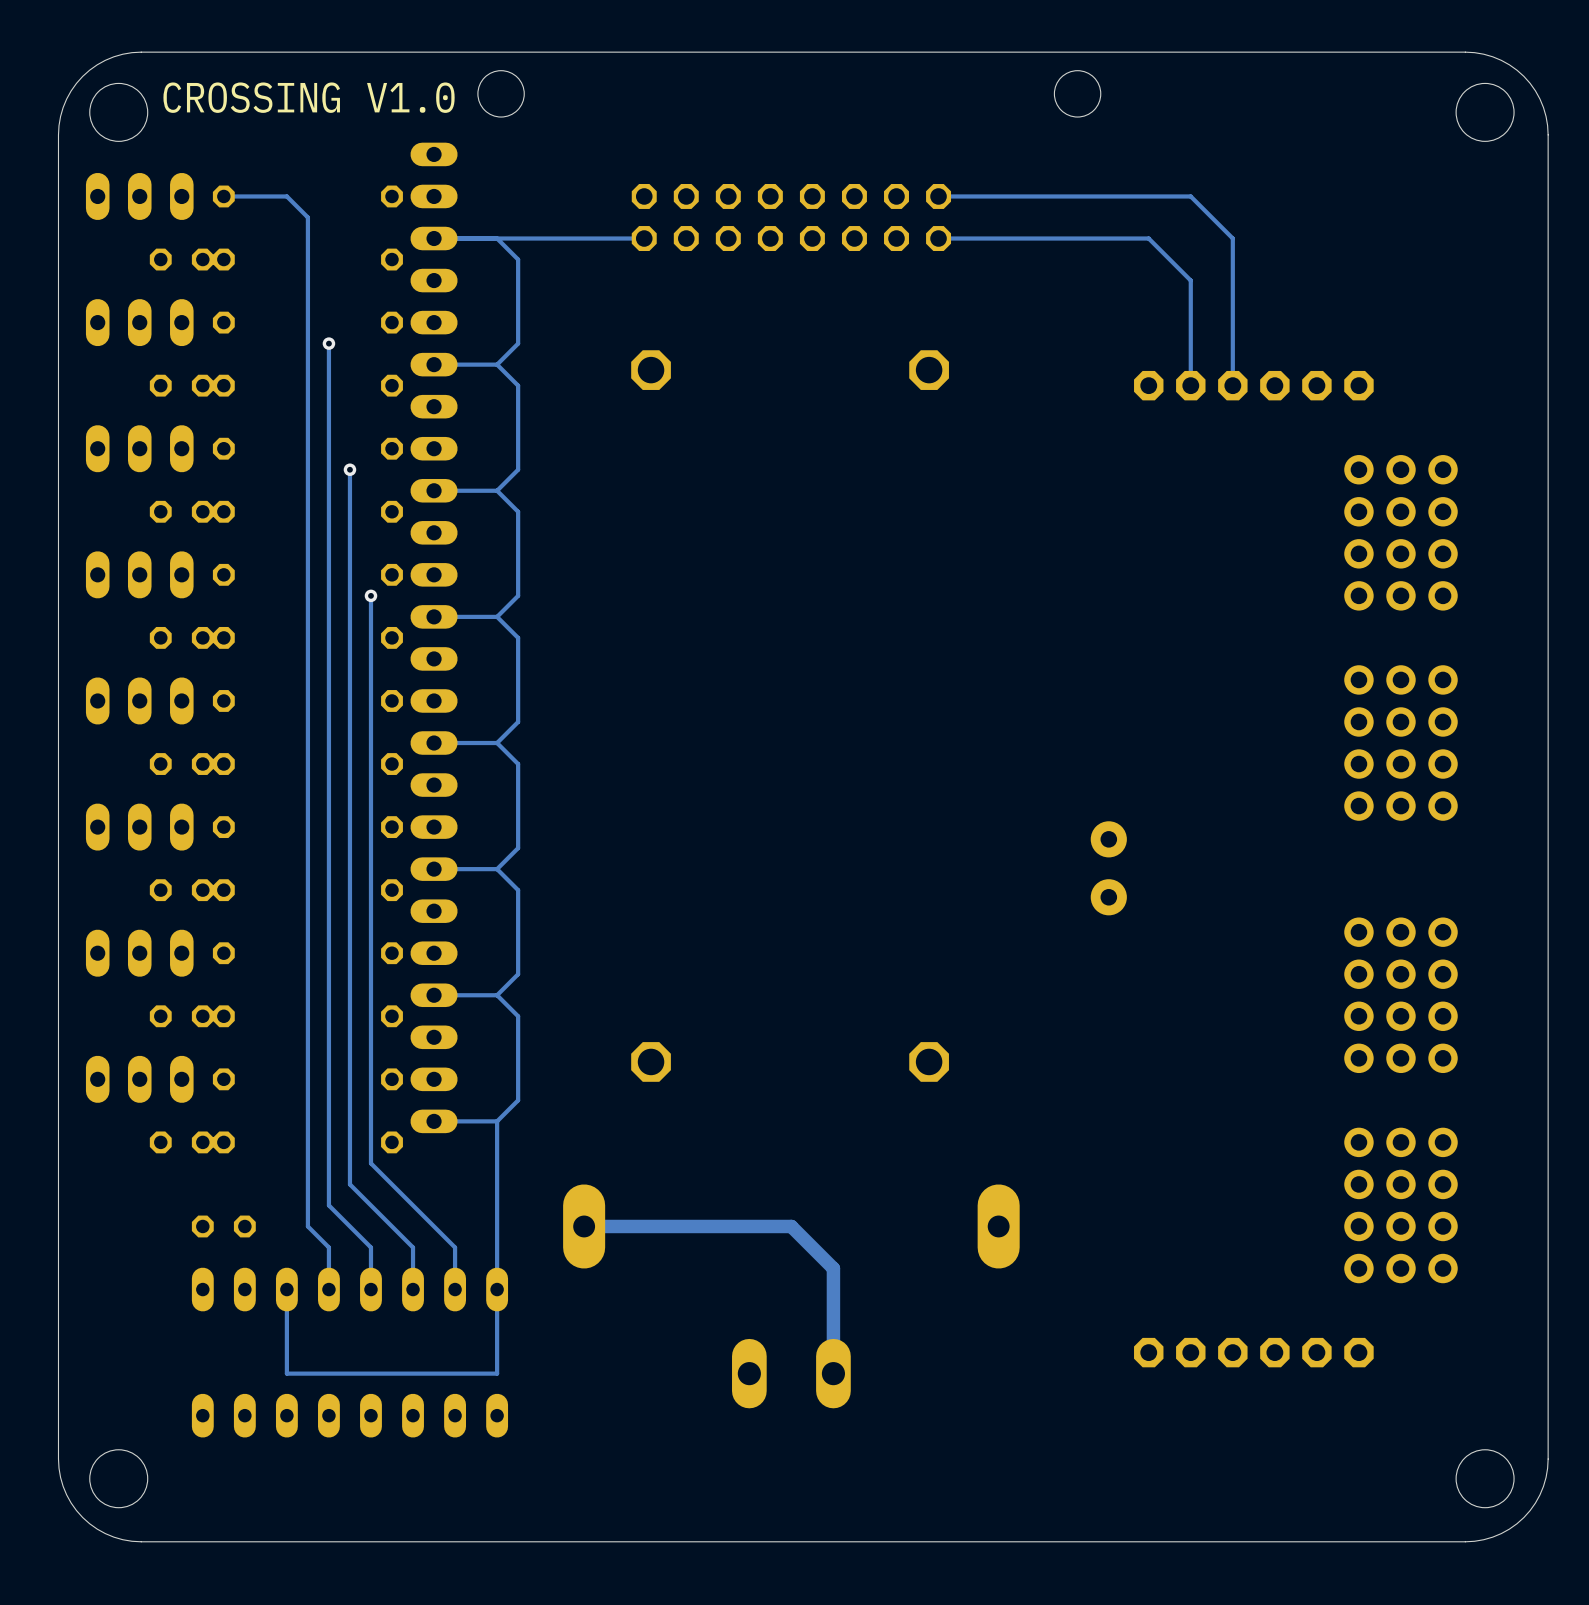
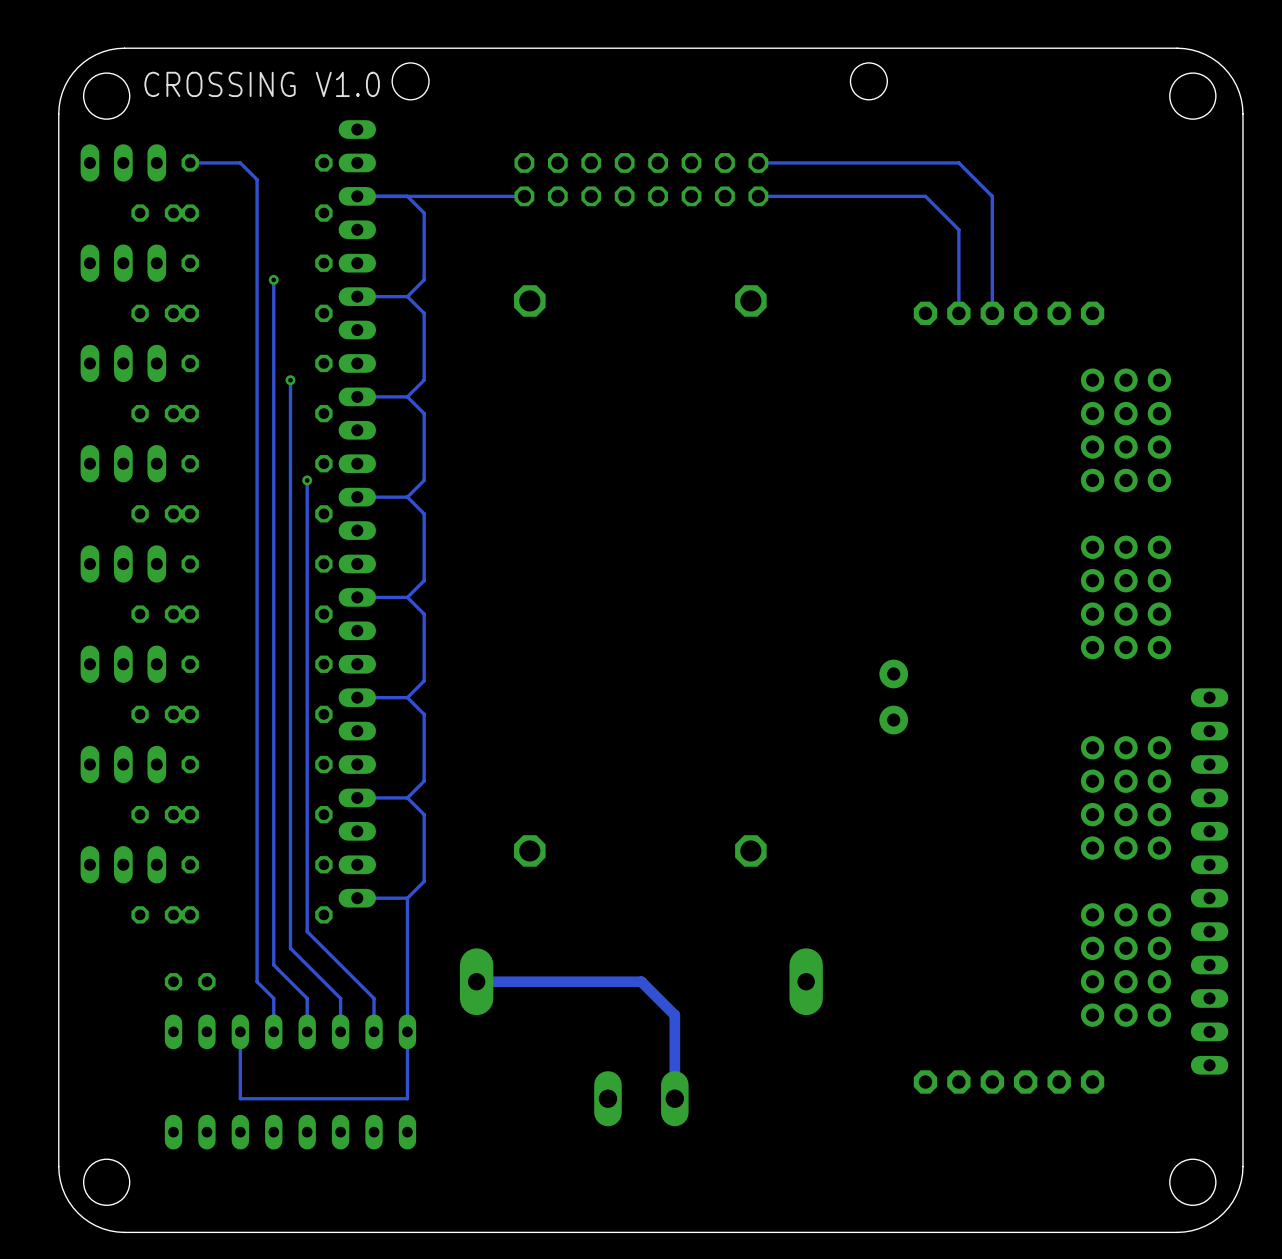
part: none -> (1209, 731)
part: none -> (1209, 831)
part: none -> (1209, 931)
part: none -> (1209, 1031)

